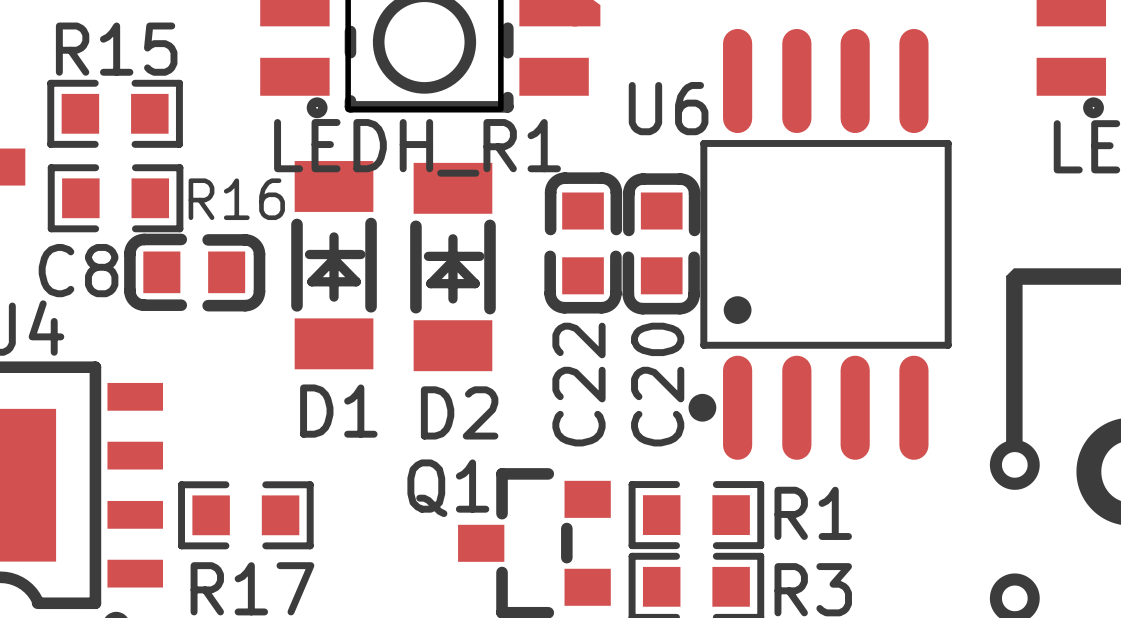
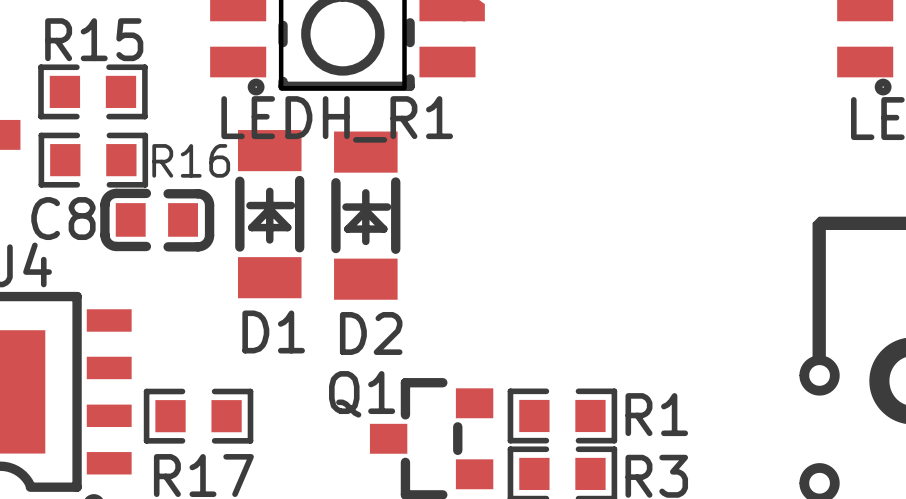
C22: (583, 242) -> none
C20: (661, 243) -> none
U6: (820, 244) -> none

